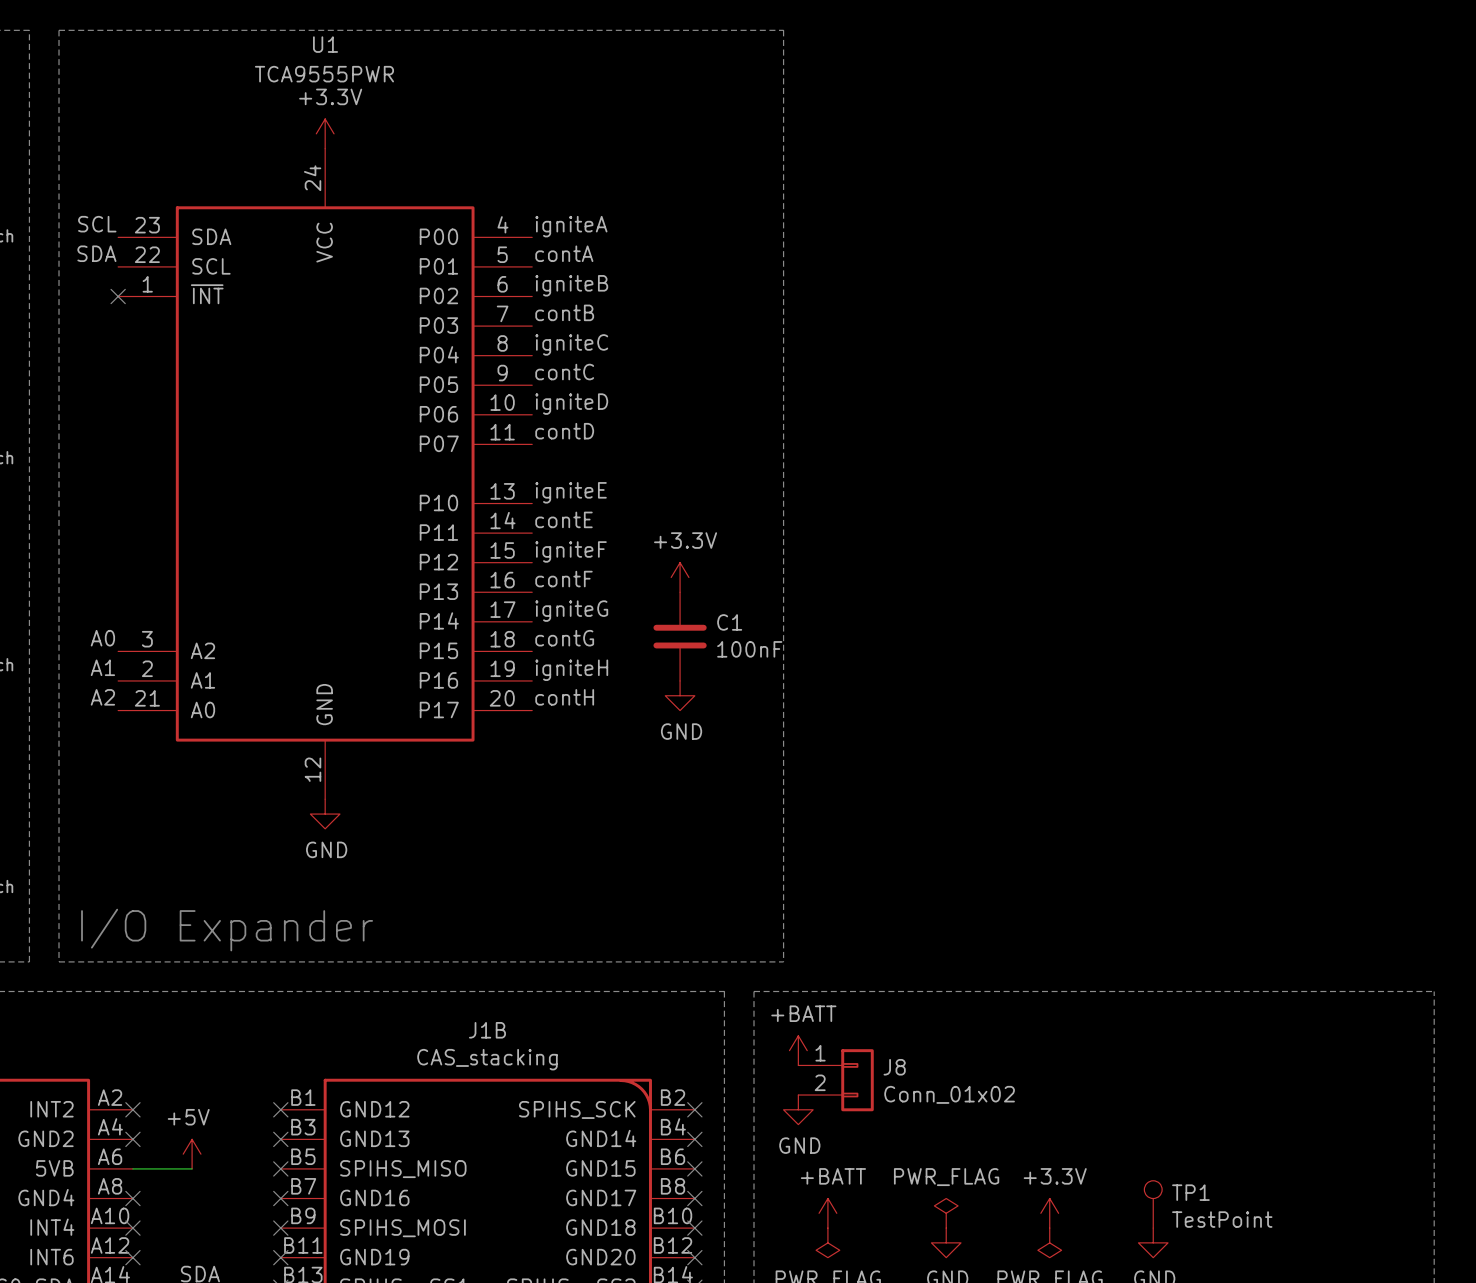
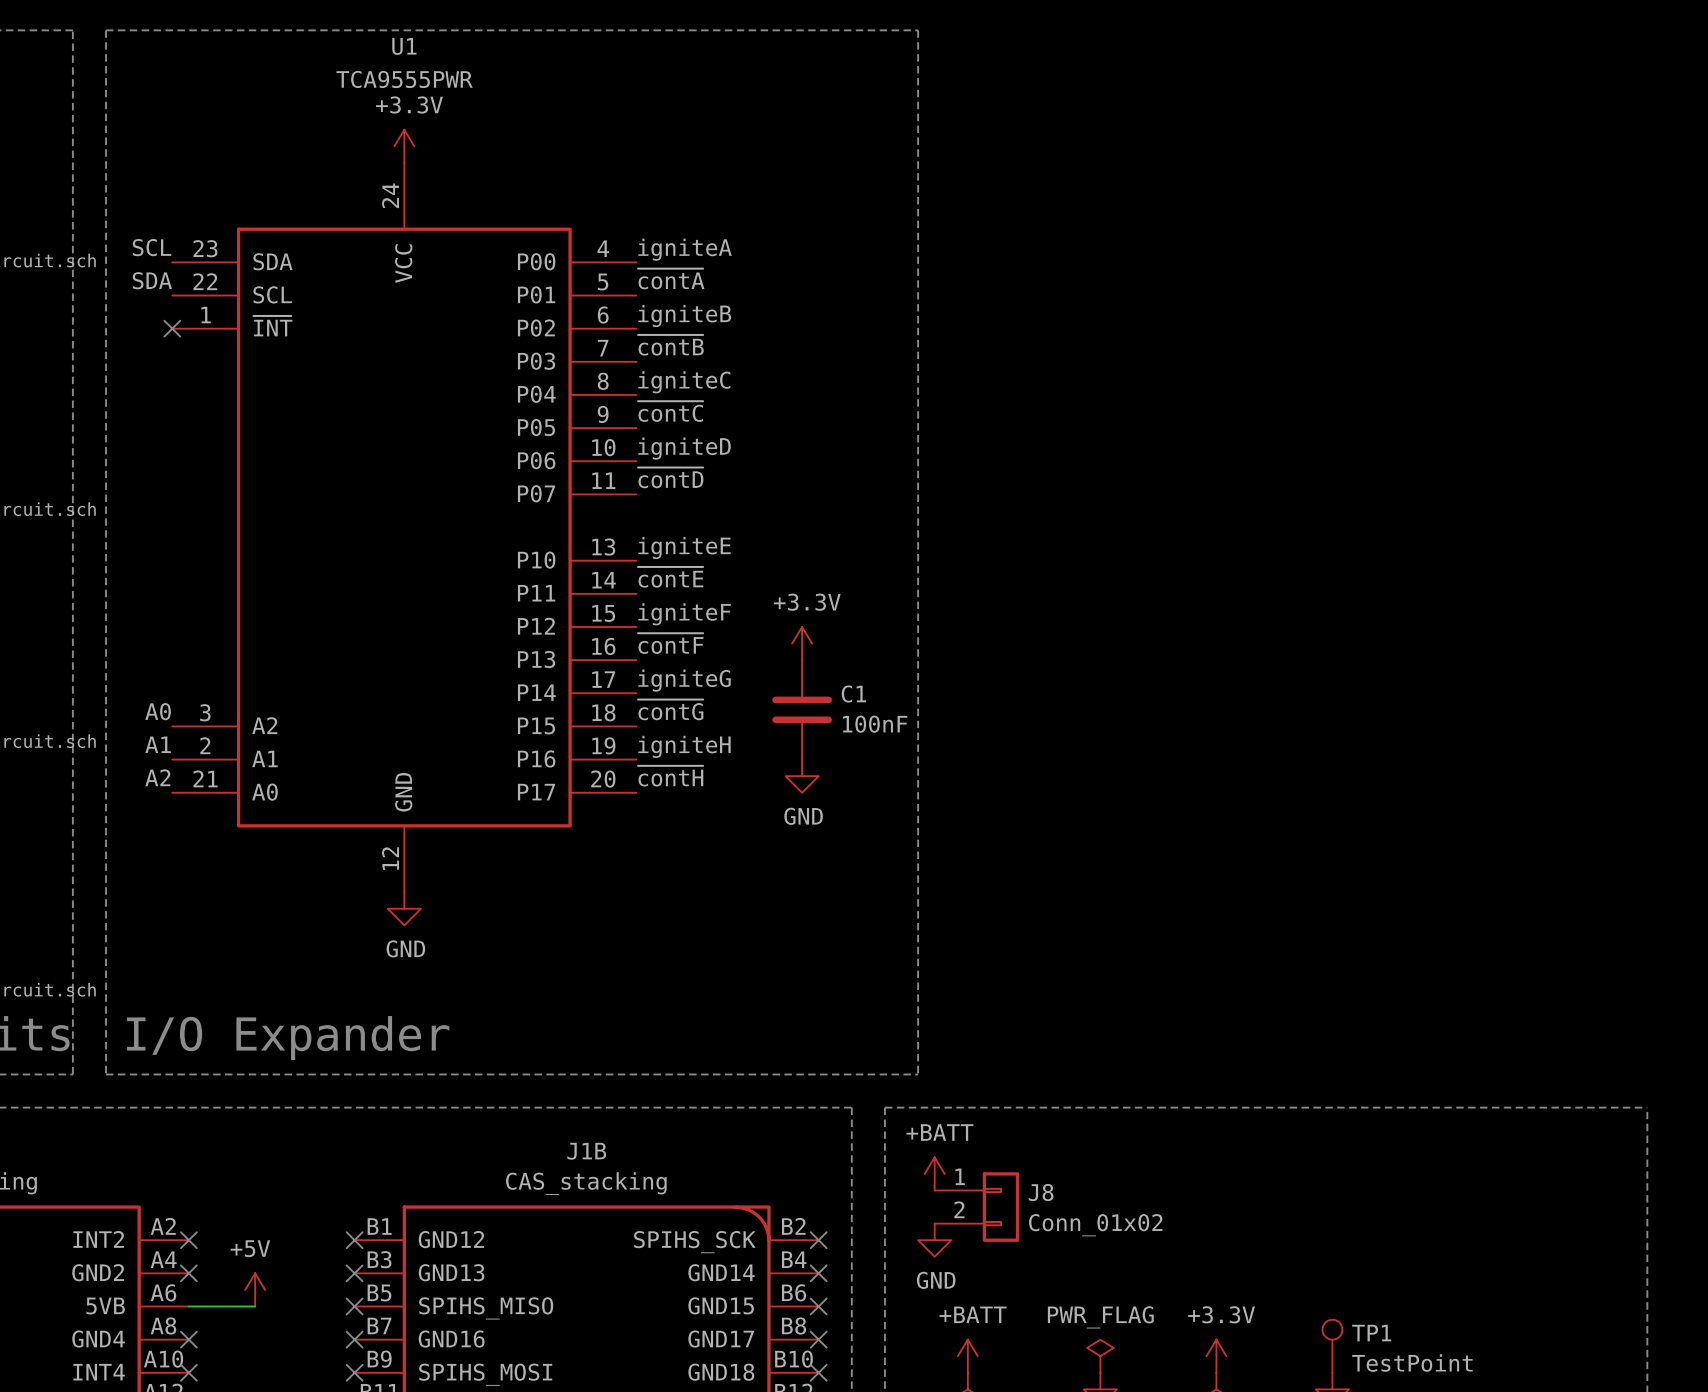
label: contA (564, 253) -> ~{contA} (671, 278)
label: contB (564, 312) -> ~{contB} (670, 345)
label: contC (564, 372) -> ~{contC} (670, 411)
label: contD (564, 431) -> ~{contD} (670, 477)
label: contE (563, 519) -> ~{contE} (670, 577)
label: contF (563, 579) -> ~{contF} (670, 643)
label: contG (564, 638) -> ~{contG} (670, 709)
label: contH (564, 697) -> ~{contH} (670, 776)

